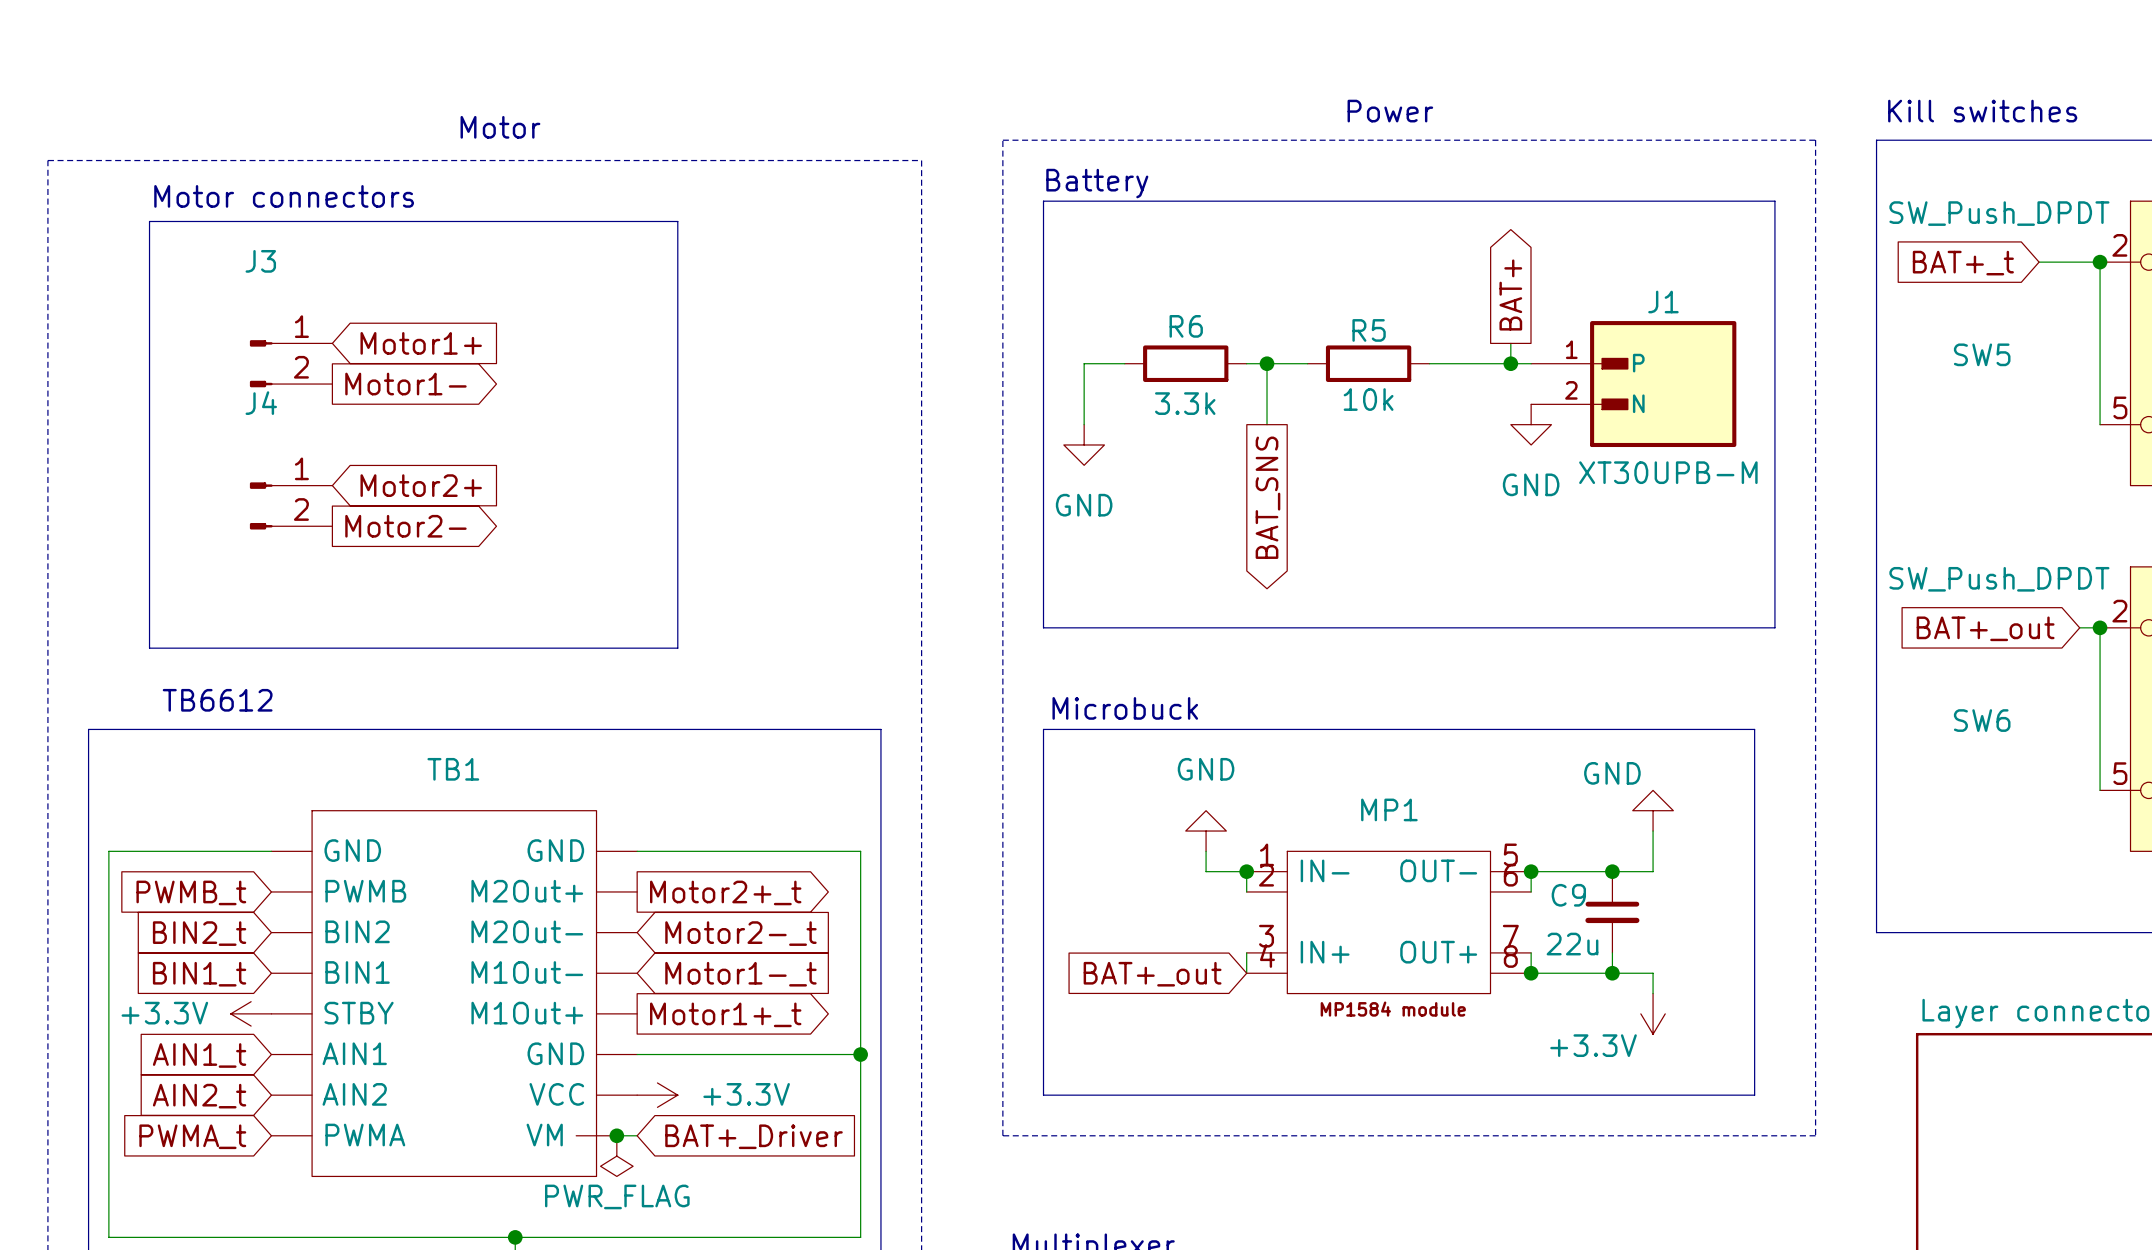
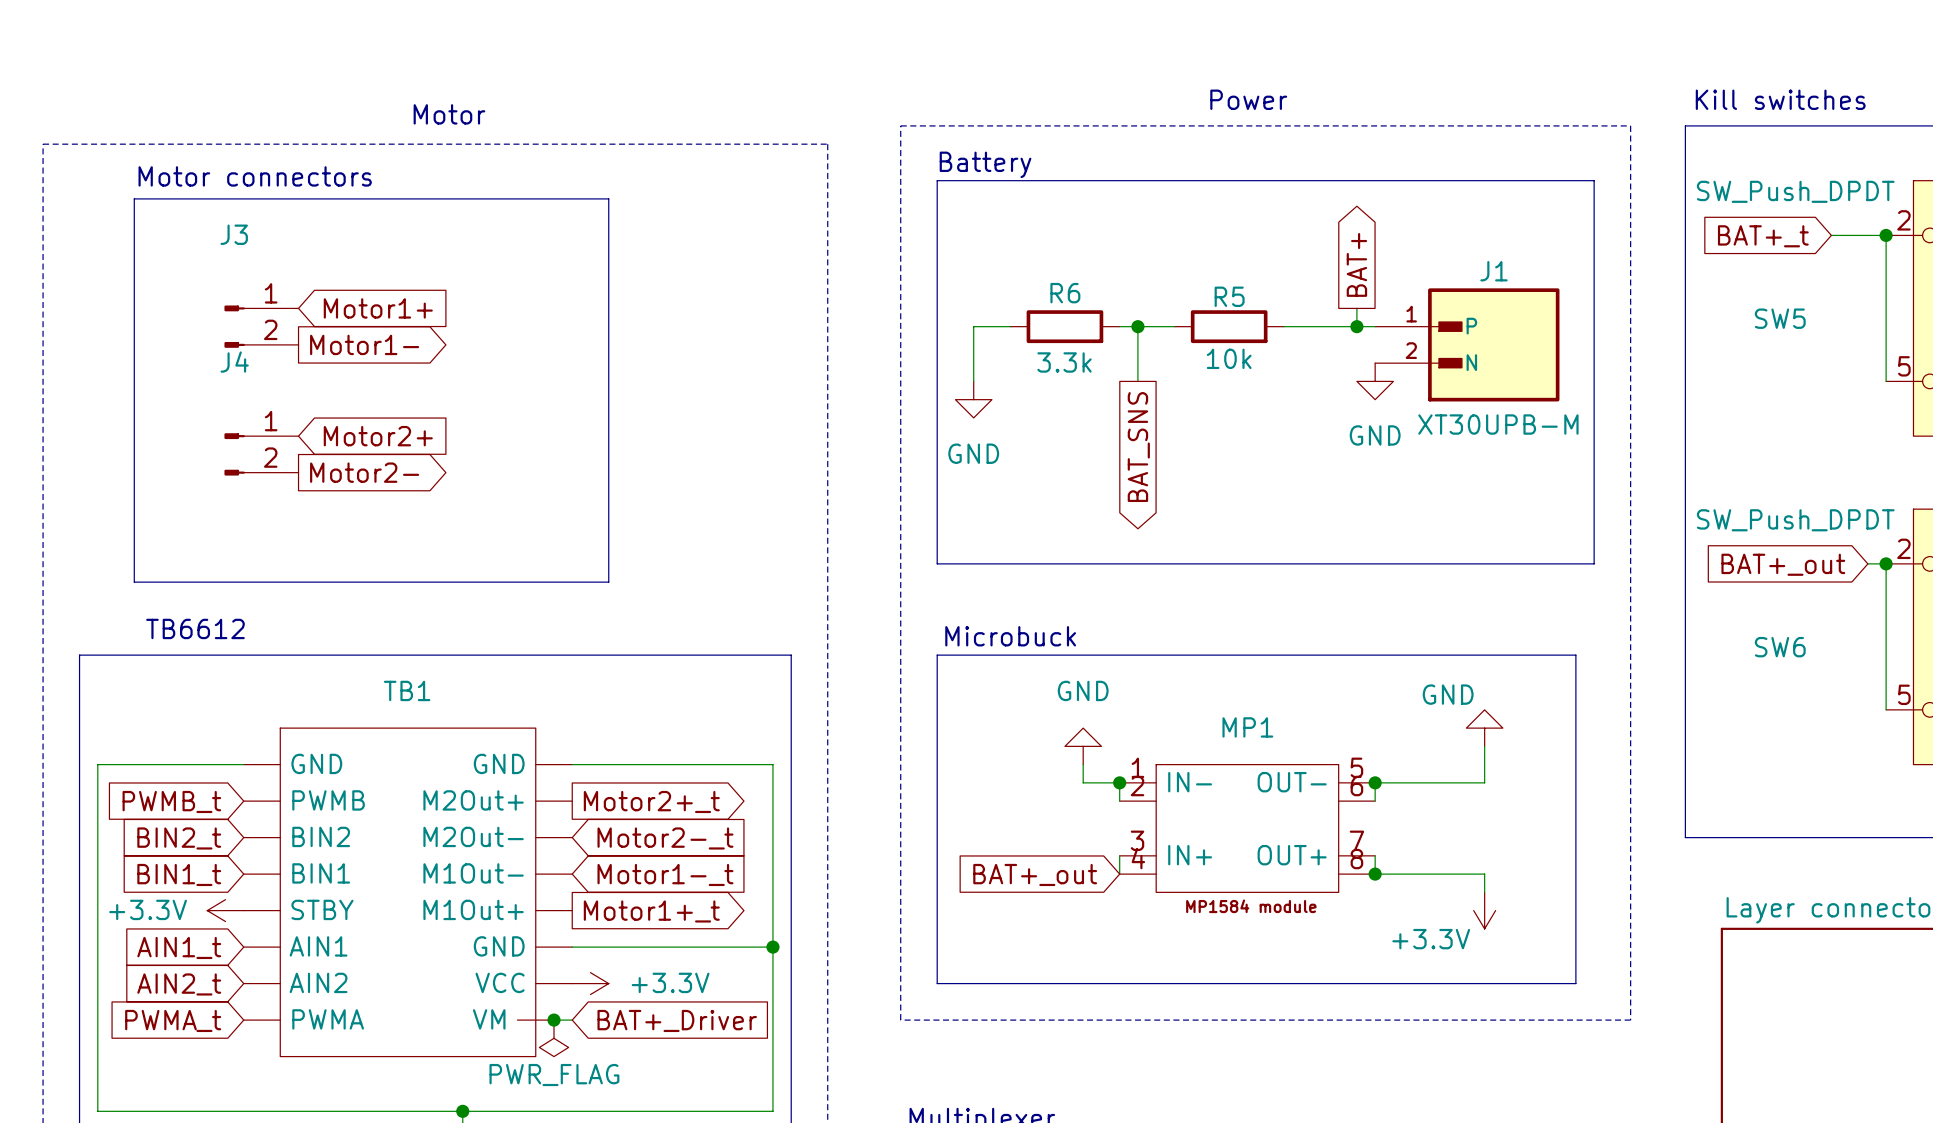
junction: (1612, 871) -> none
C9: 22u (1612, 912) -> none
wire: (1612, 952) (1612, 973) -> none
junction: (1612, 973) -> none

